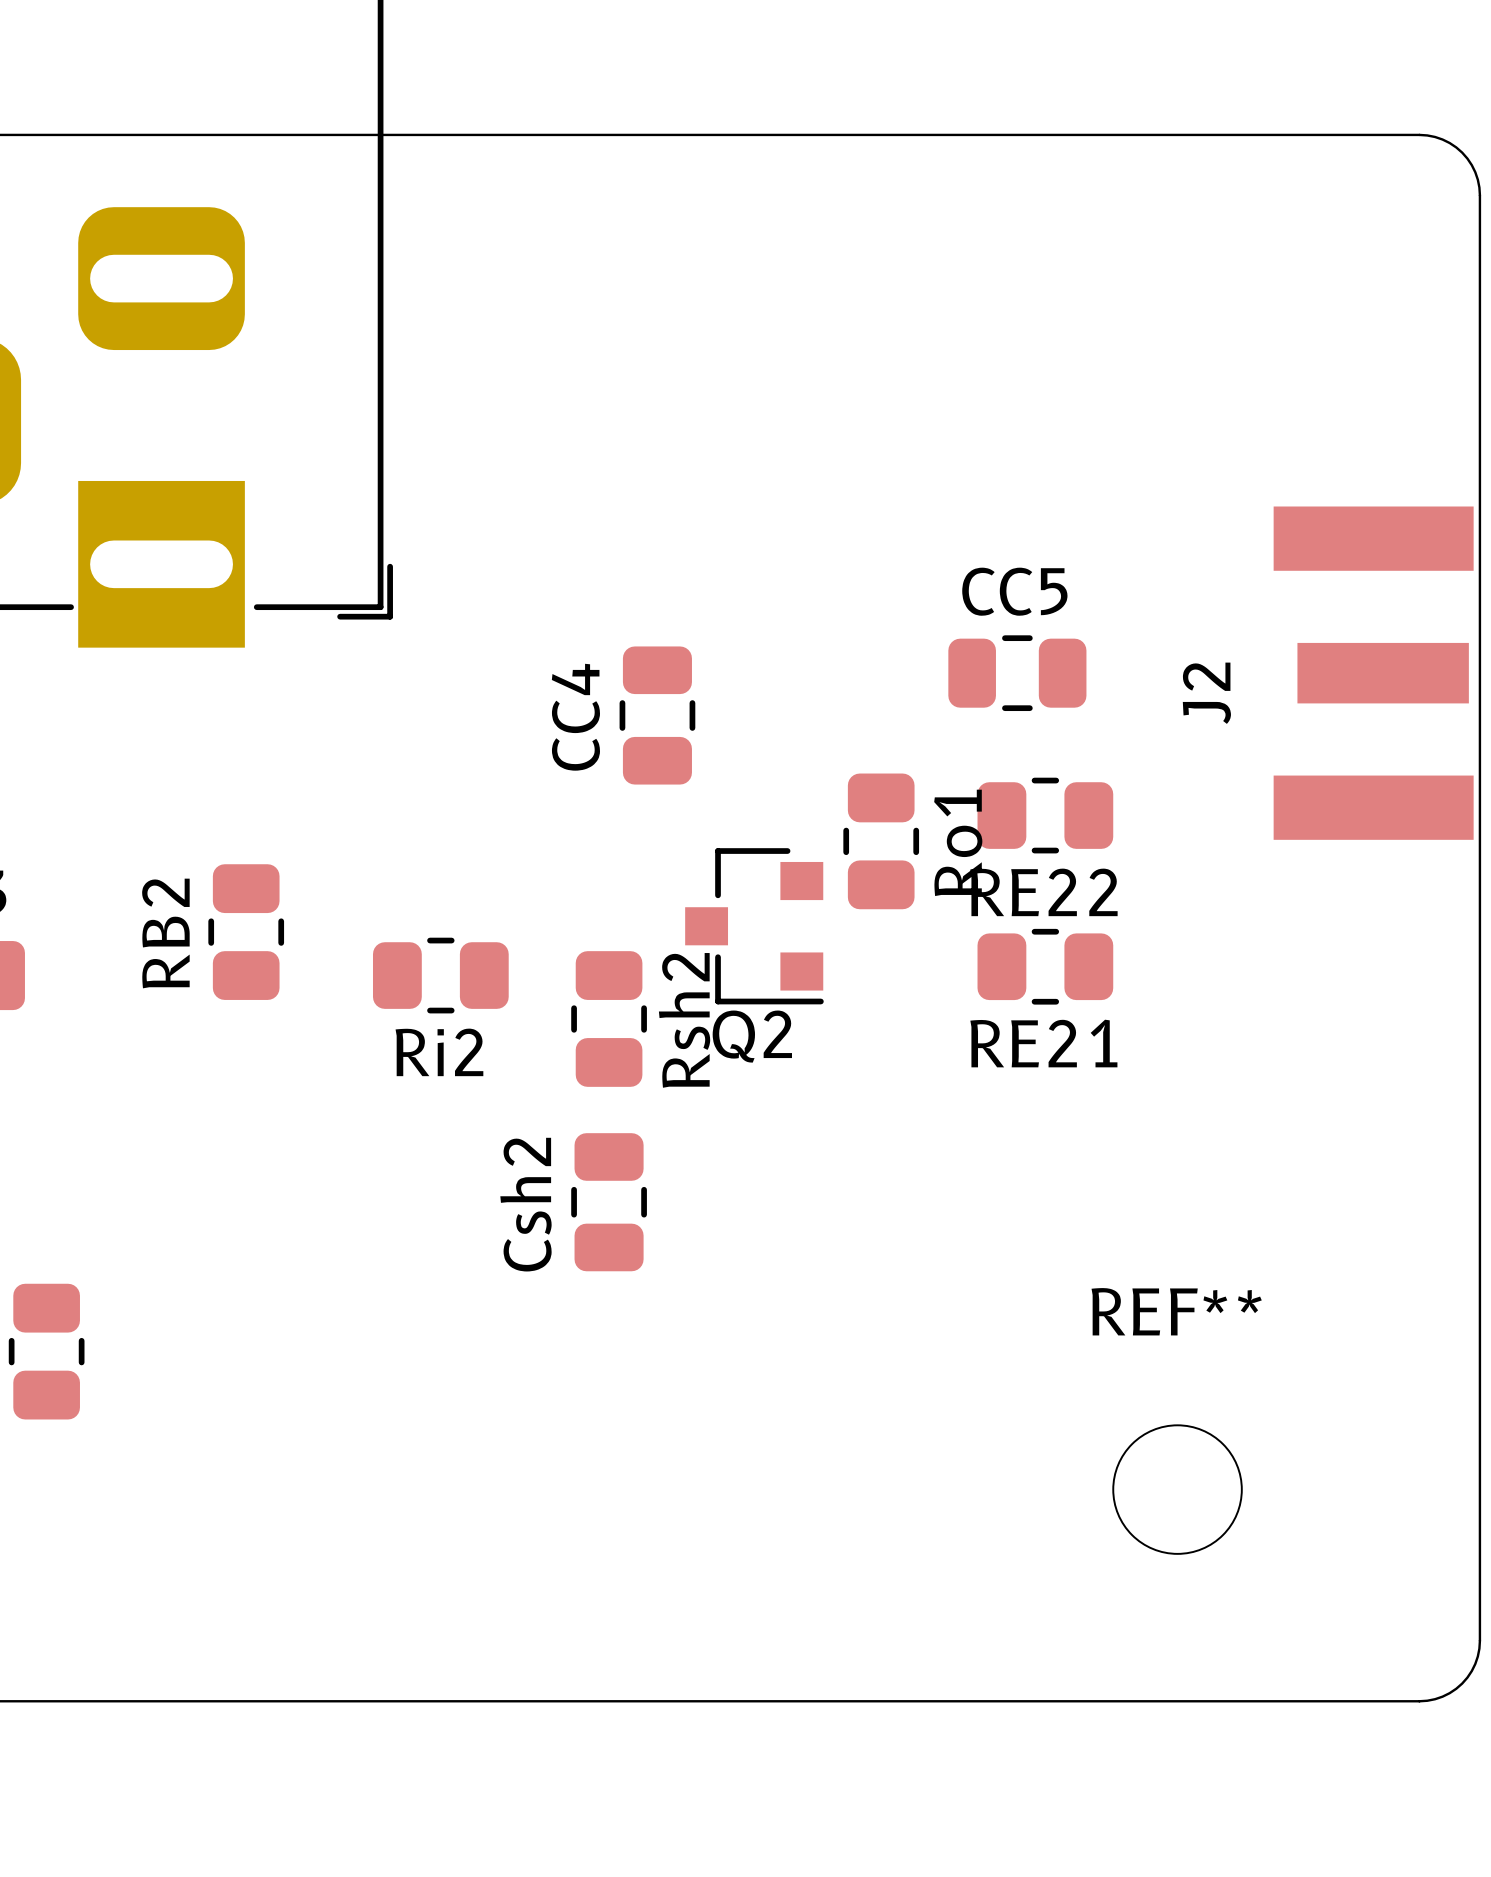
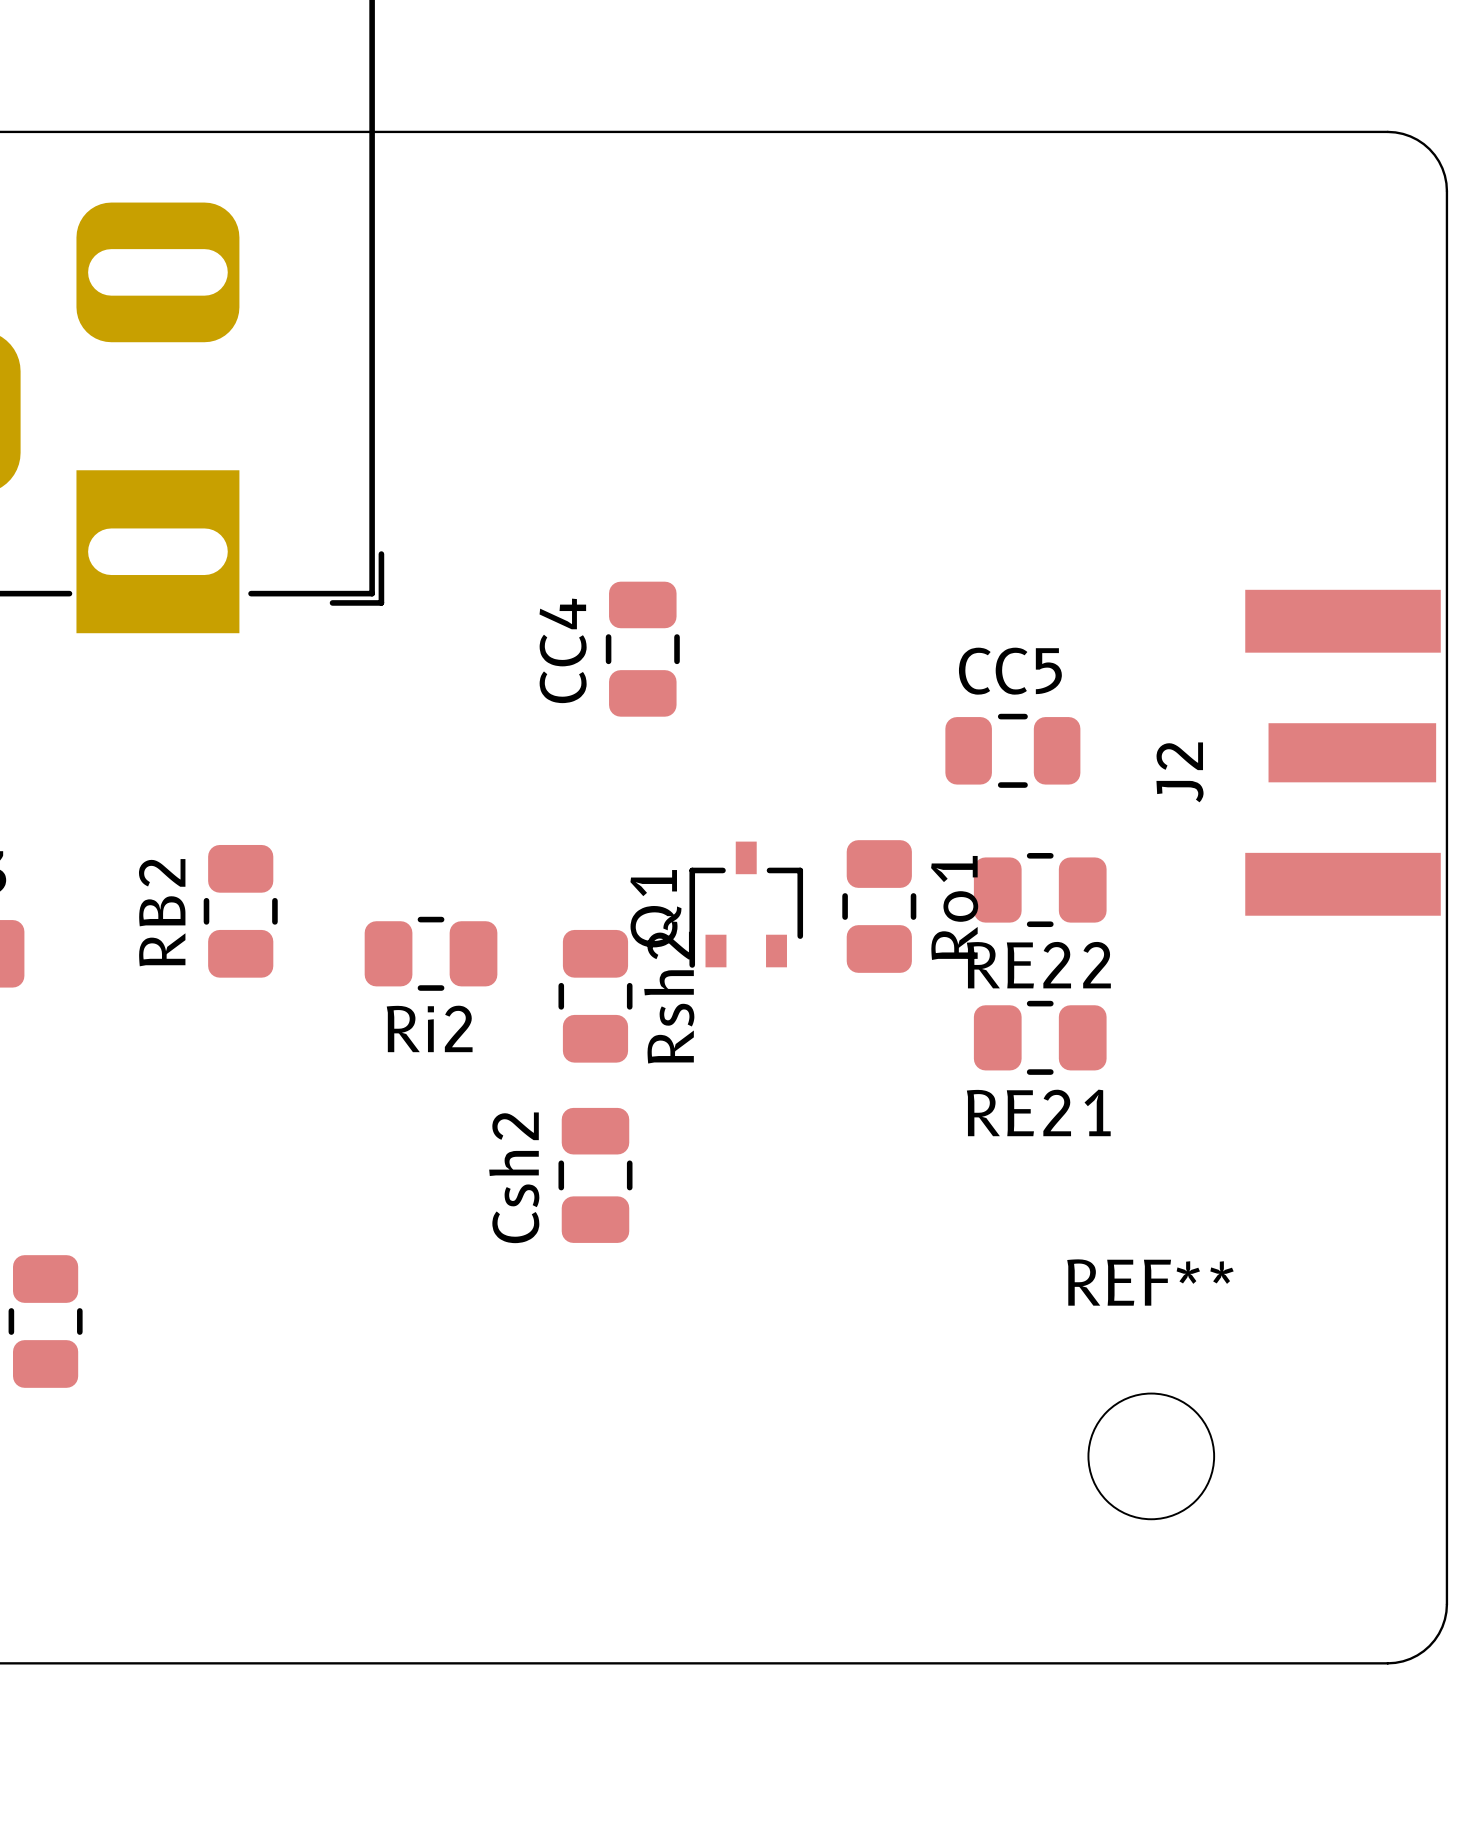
CC5 position: (1017, 673) -> (1012, 750)
J2 position: (1373, 673) -> (1343, 752)
CC4 position: (657, 715) -> (642, 649)
RE22 position: (1045, 815) -> (1040, 890)
Ro1 position: (881, 841) -> (879, 906)
Q1: none -> (746, 904)
Q2: (754, 926) -> none
RE21 position: (1045, 966) -> (1040, 1037)

